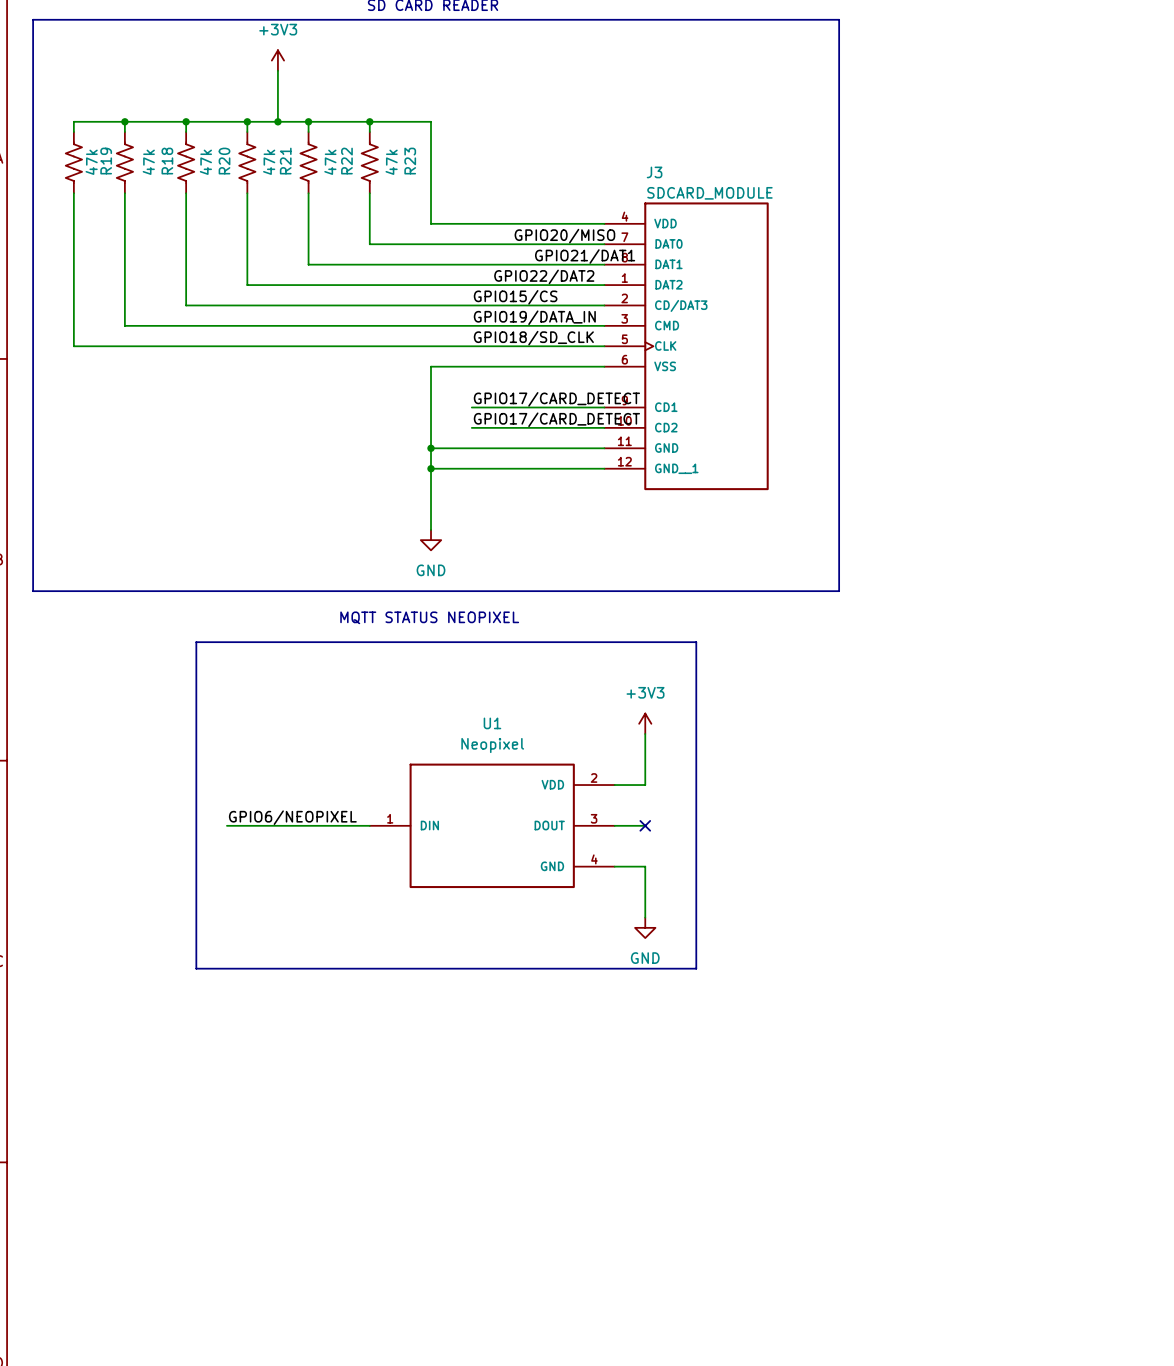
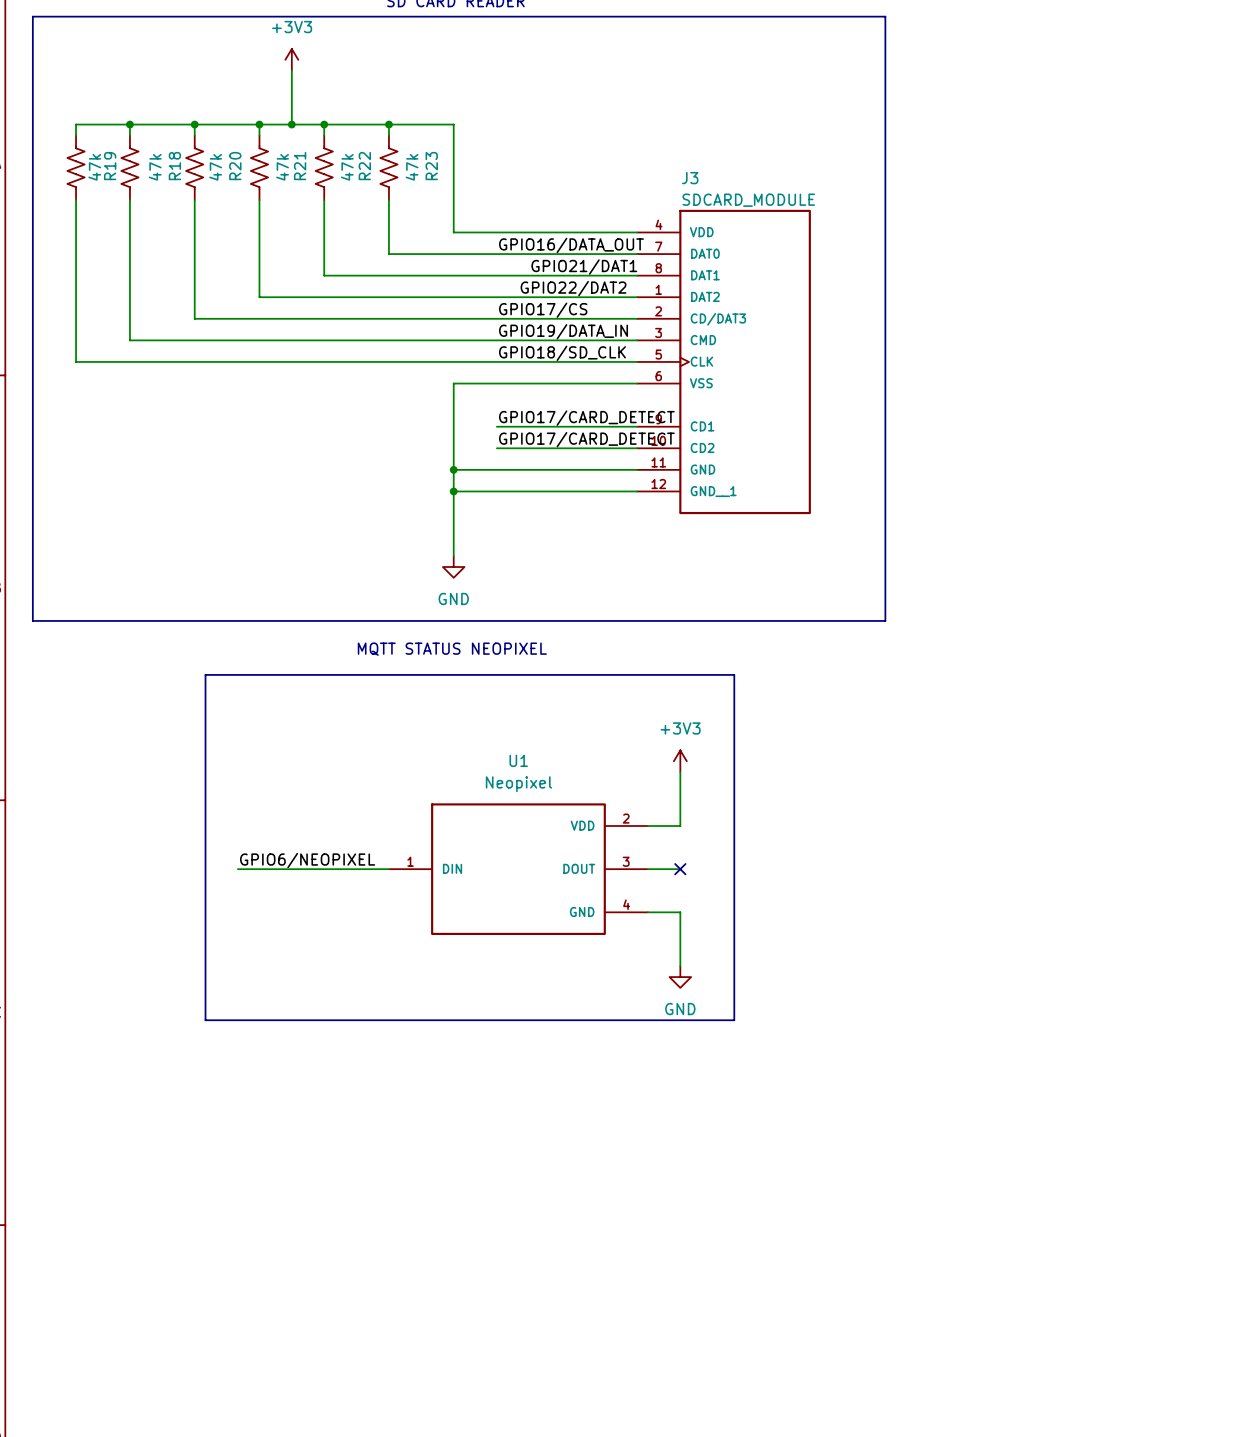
label: none -> GPIO16/DATA_OUT (571, 245)
label: GPIO20/MISO (564, 236) -> none
label position: GPIO21/DAT1 (585, 256) -> GPIO21/DAT1 (584, 267)
label: GPIO15/CS (515, 297) -> GPIO17/CS (543, 310)

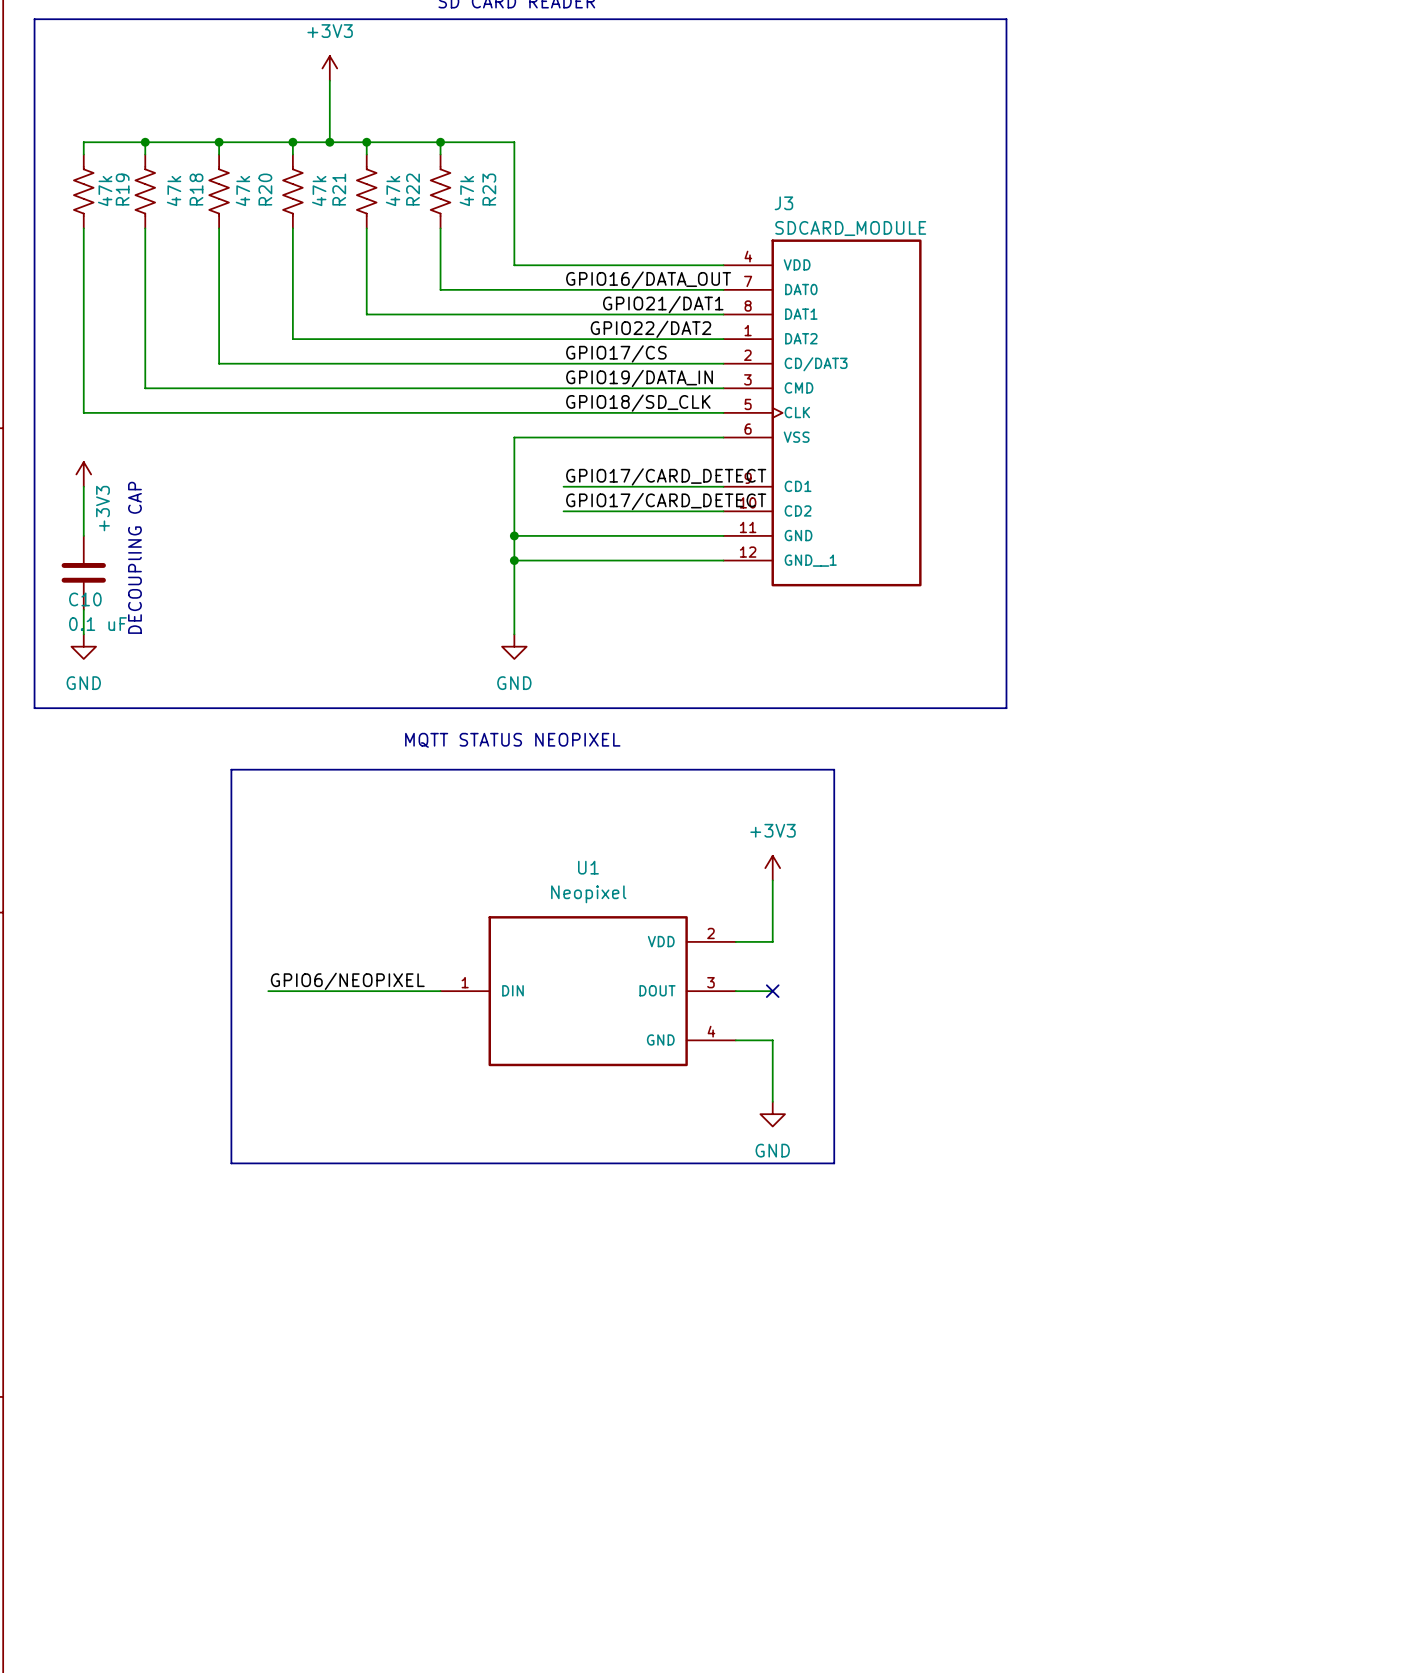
power symbol: none -> +3V3 (83, 474)
wire: none -> (83, 486) (83, 535)
text: none -> DECOUPlING CAP (134, 557)
C10: none -> 0.1 uF (83, 572)
wire: none -> (83, 609) (83, 634)
power symbol: none -> GND (83, 646)

